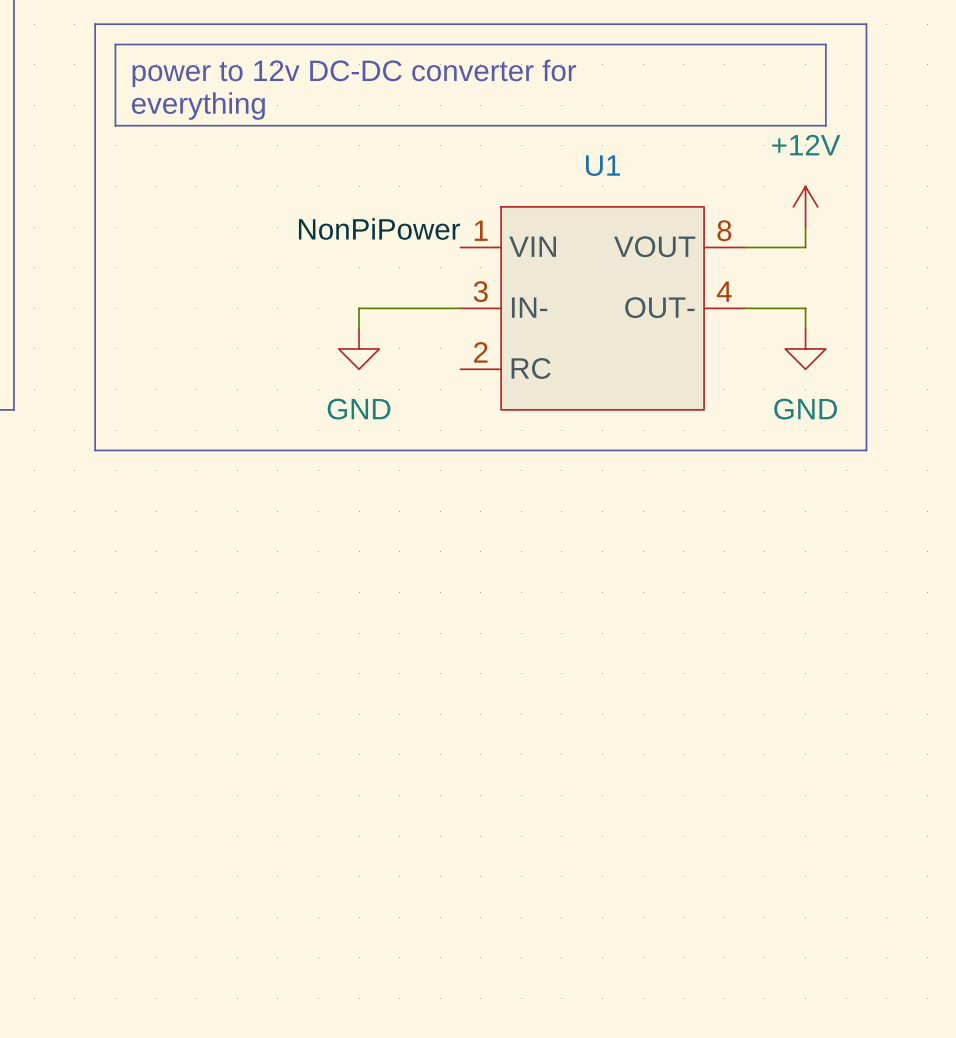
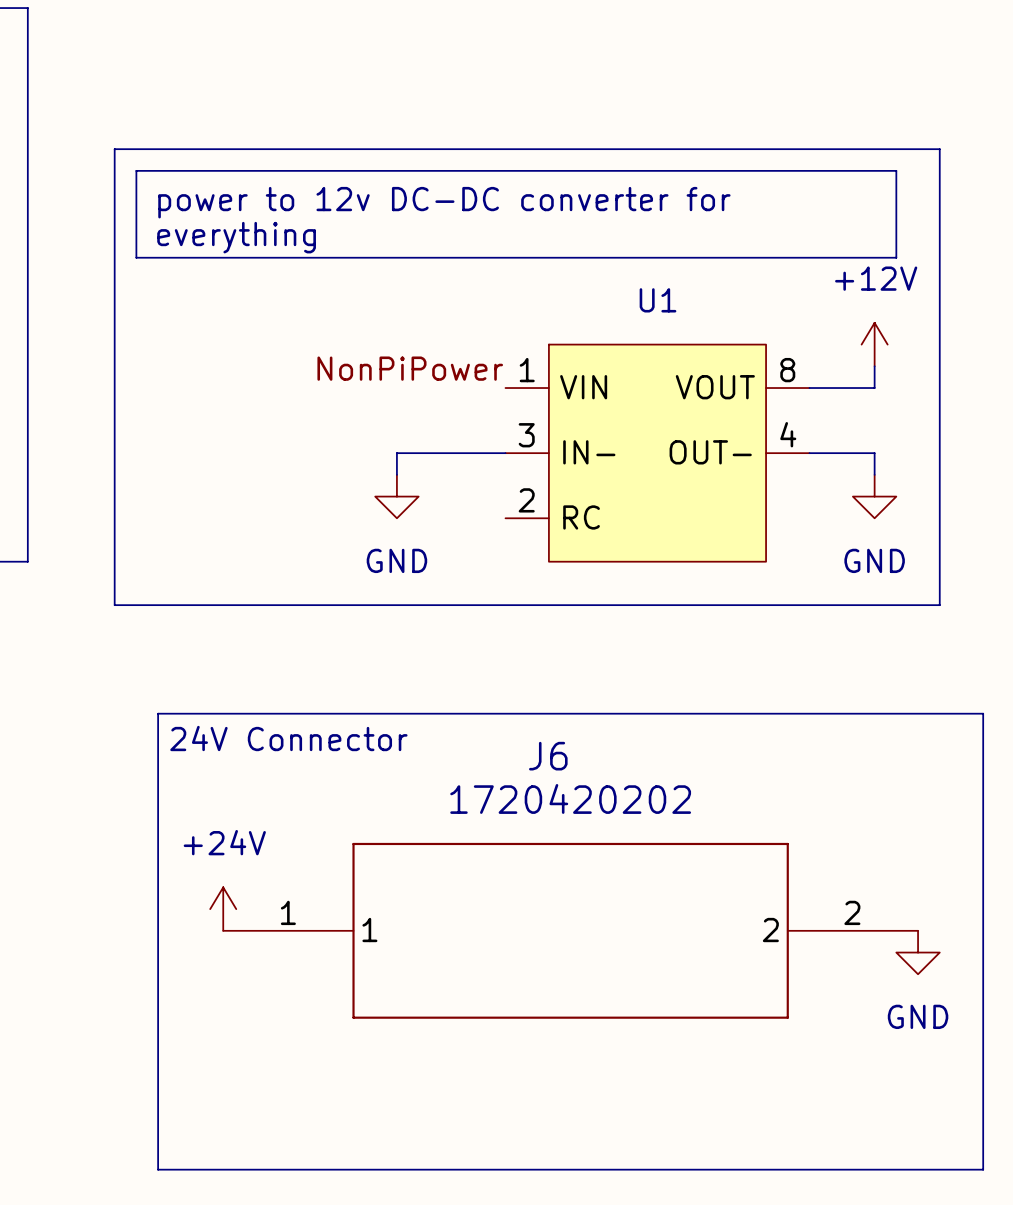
line: none -> (158, 713) (983, 713) (983, 1169) (158, 1169) (158, 713)
text: none -> 24V Connector (288, 738)
power symbol: none -> +24V (223, 909)
J6: none -> 1720420202 (570, 930)
power symbol: none -> GND (918, 952)

